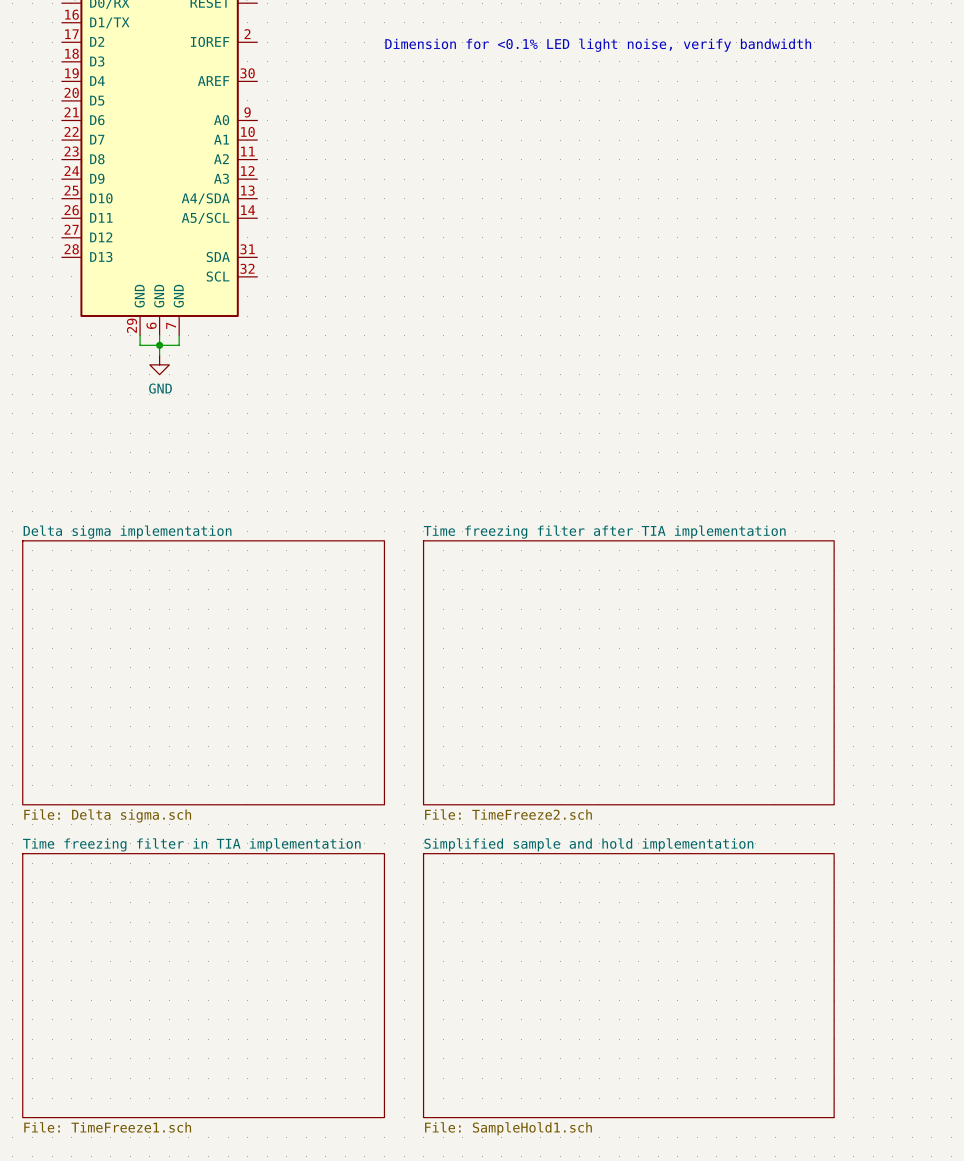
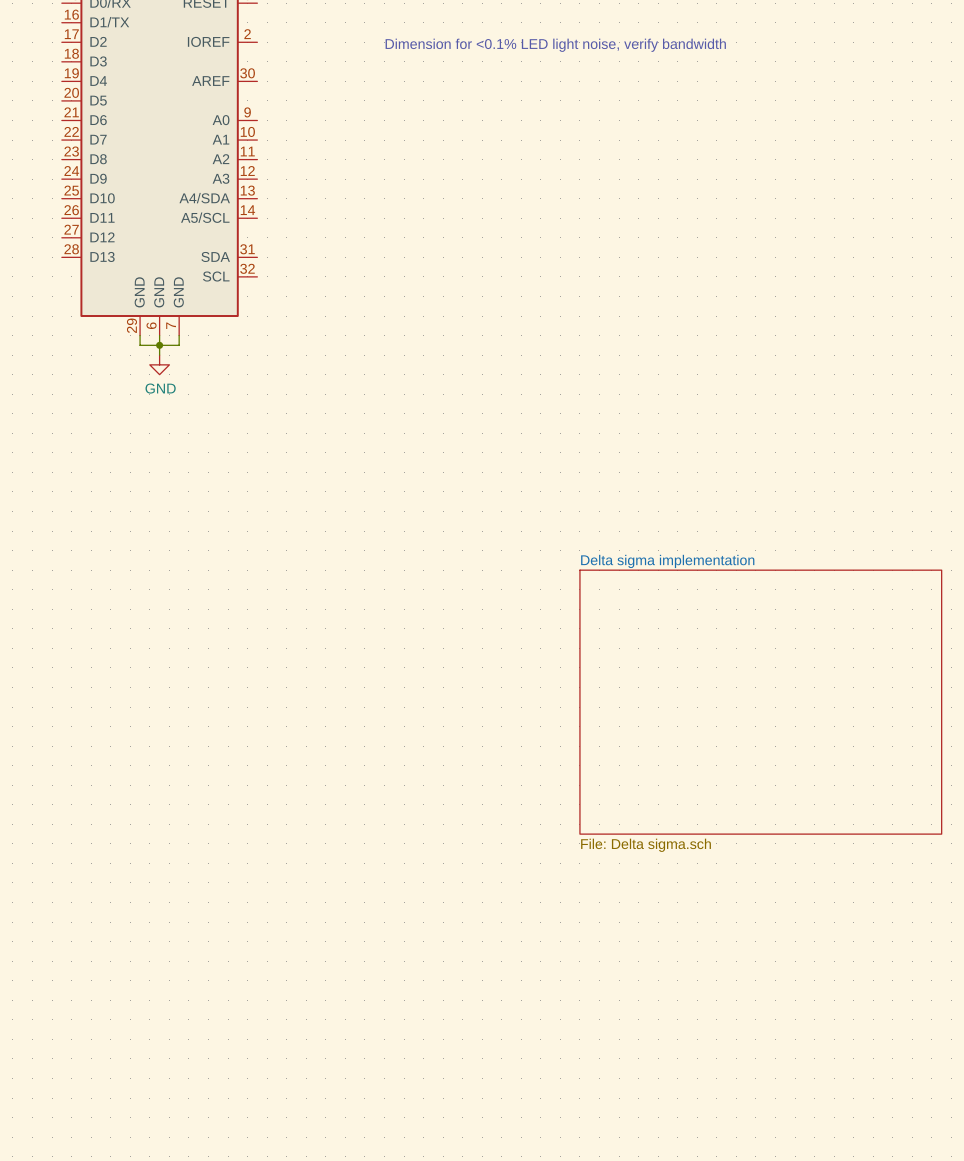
sheet Delta sigma implementation: File: Delta sigma.sch (203, 672) -> none
sheet Time freezing filter after TIA implementation: File: TimeFreeze2.sch (628, 672) -> none
sheet Delta sigma implementation: none -> File: Delta sigma.sch (760, 702)
sheet Time freezing filter in TIA implementation: File: TimeFreeze1.sch (203, 985) -> none
sheet Simplified sample and hold implementation: File: SampleHold1.sch (628, 985) -> none

